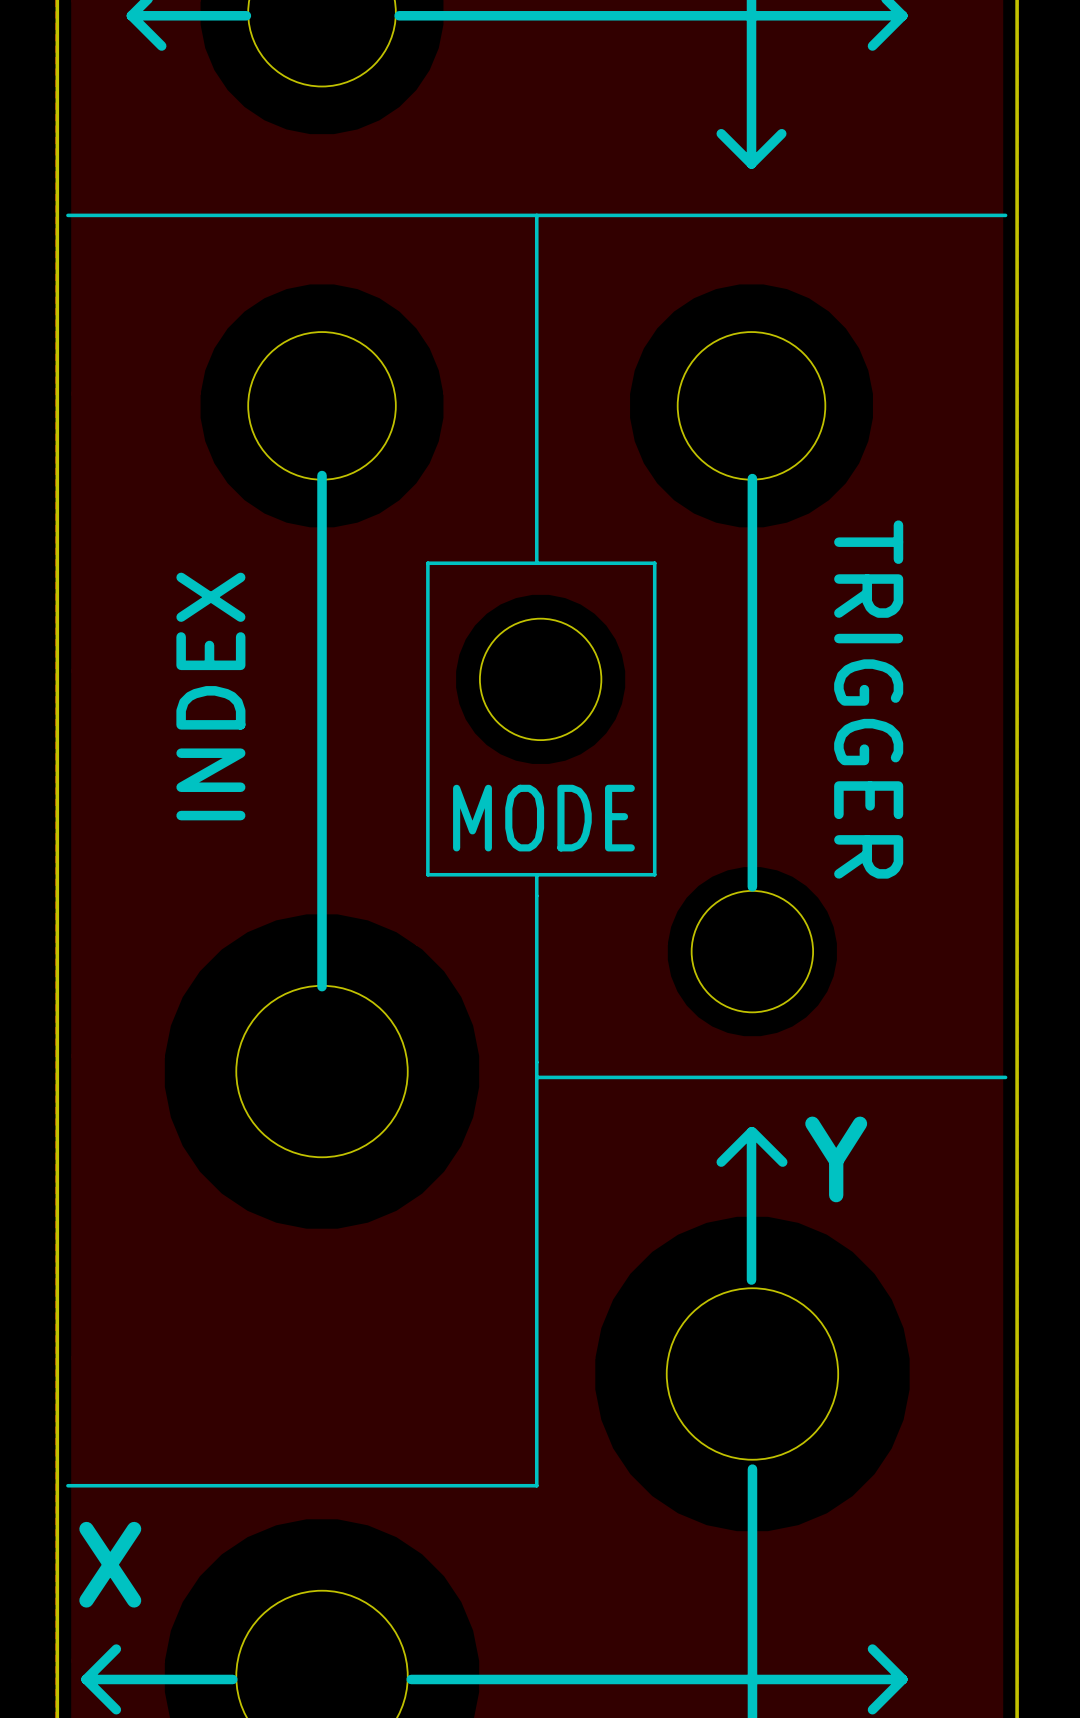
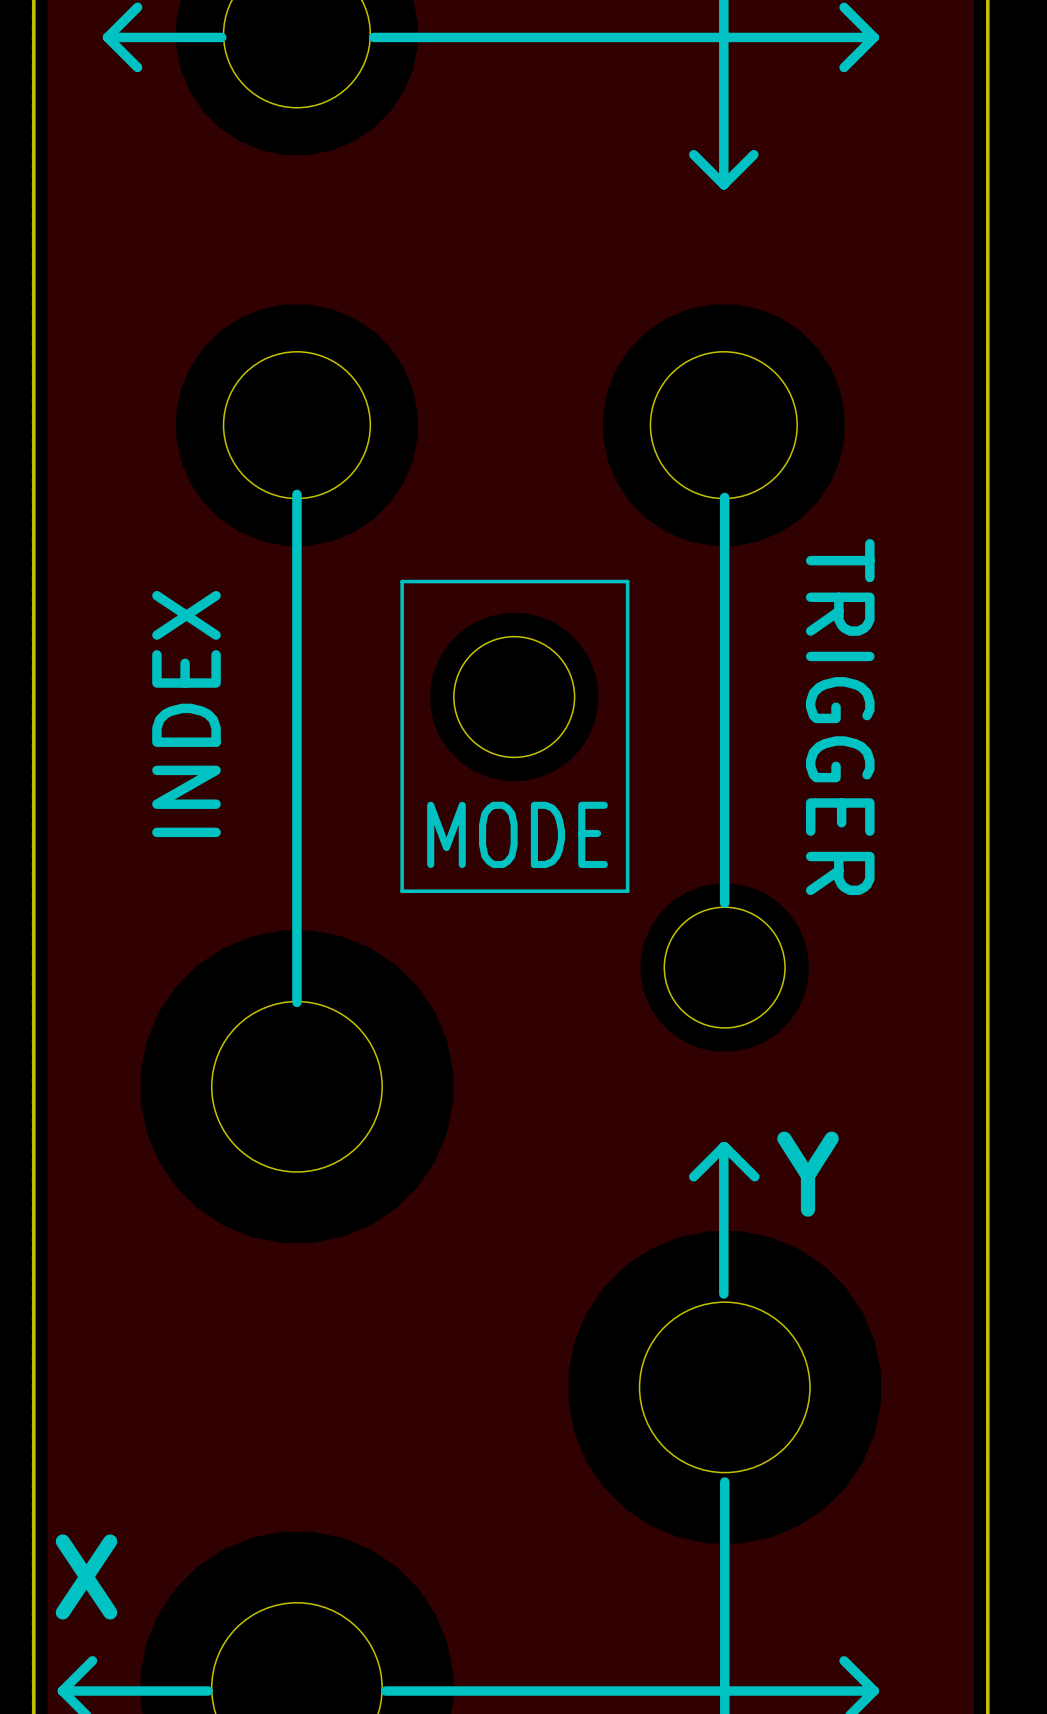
line: (67, 215) (1005, 215) -> none
line: (536, 215) (536, 563) -> none
line: (536, 874) (536, 1485) (67, 1485) -> none
line: (536, 1077) (1005, 1077) -> none

